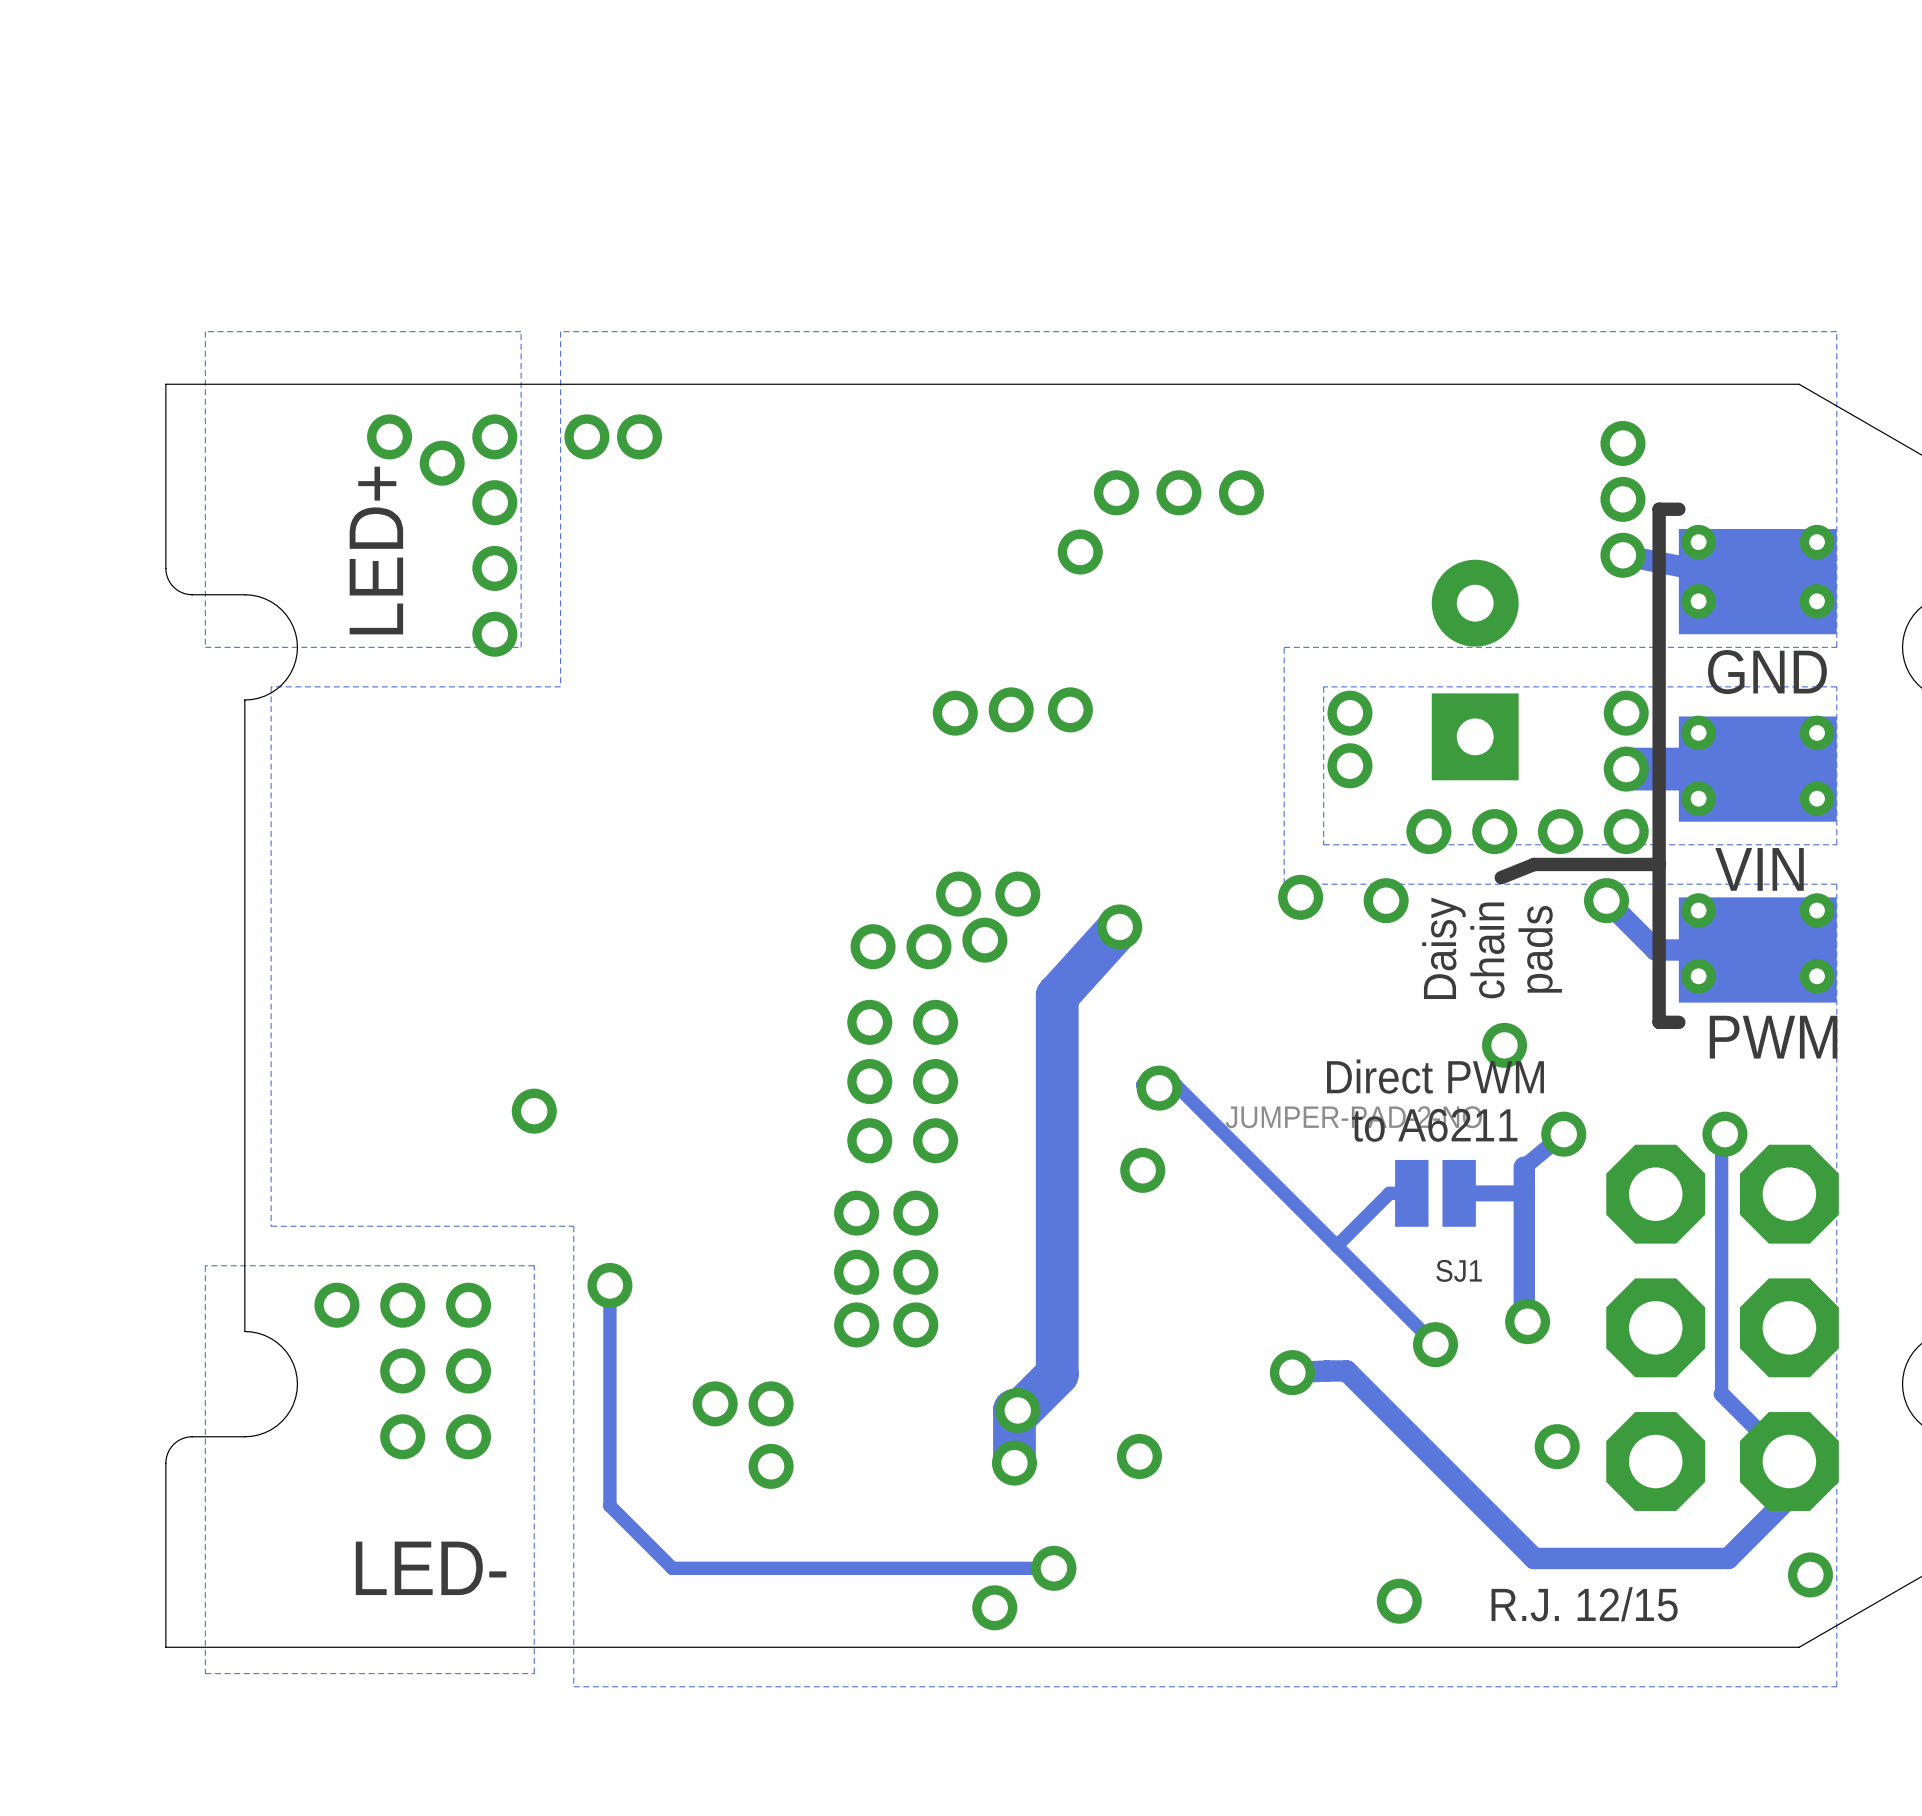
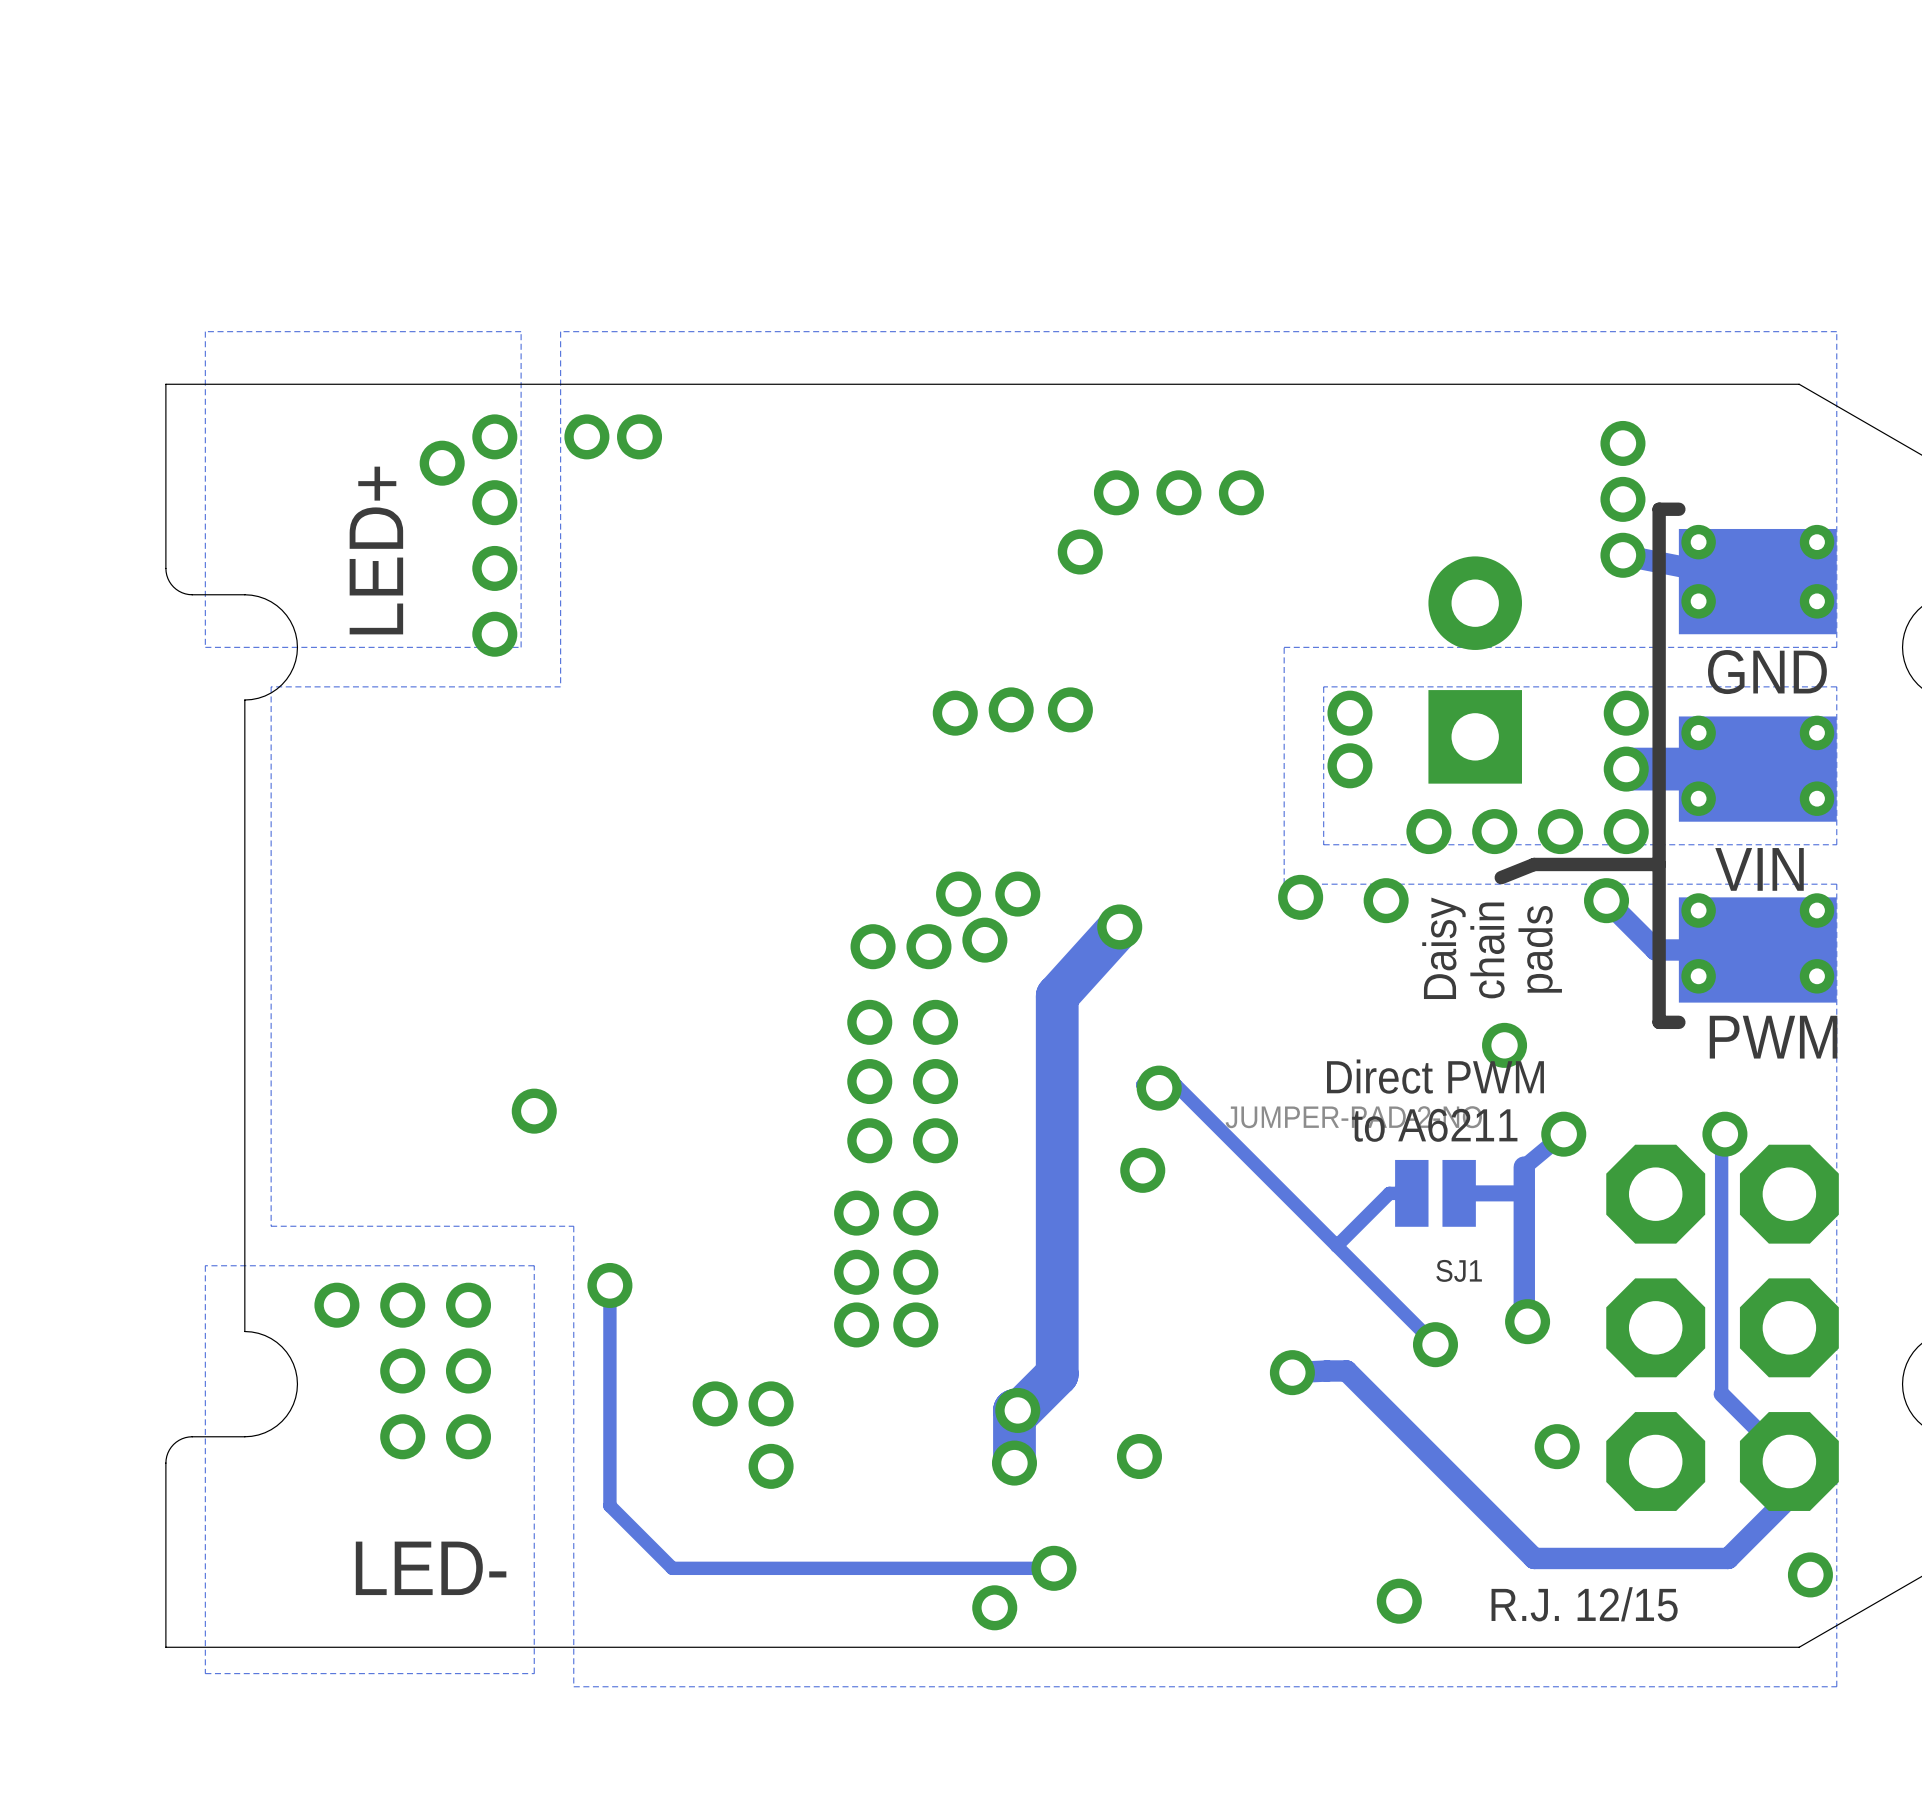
via: (389, 436) -> none
part footprint: [1431, 559, 1519, 781] -> [1428, 556, 1523, 784]

